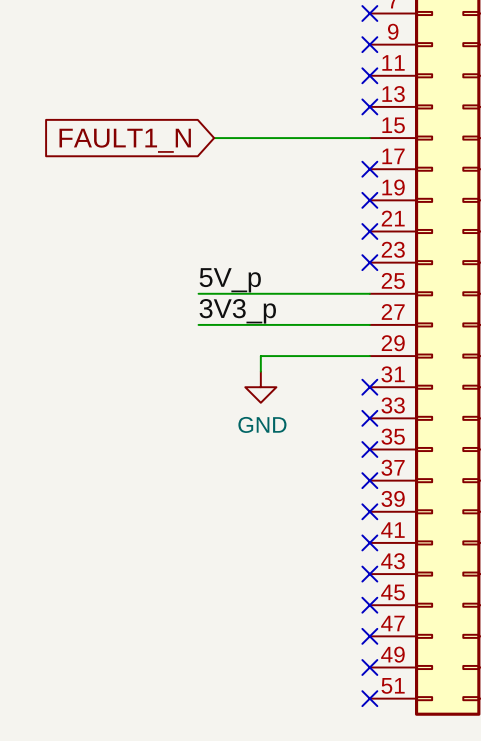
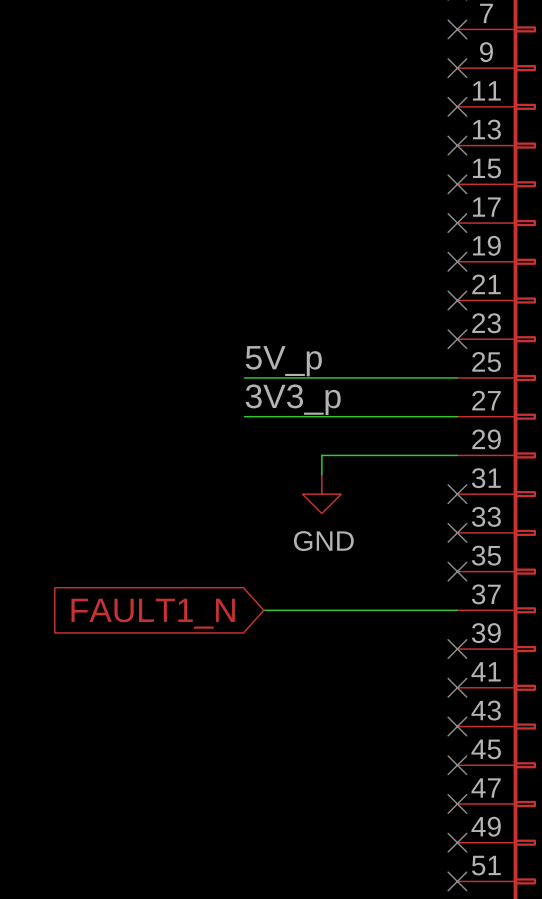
wire: (214, 138) (369, 138) -> none
no-connect mark: none -> (457, 184)
global label: FAULT1_N (125, 140) -> none
wire: none -> (263, 610) (457, 610)
no-connect mark: (369, 480) -> none
global label: none -> FAULT1_N (153, 613)

